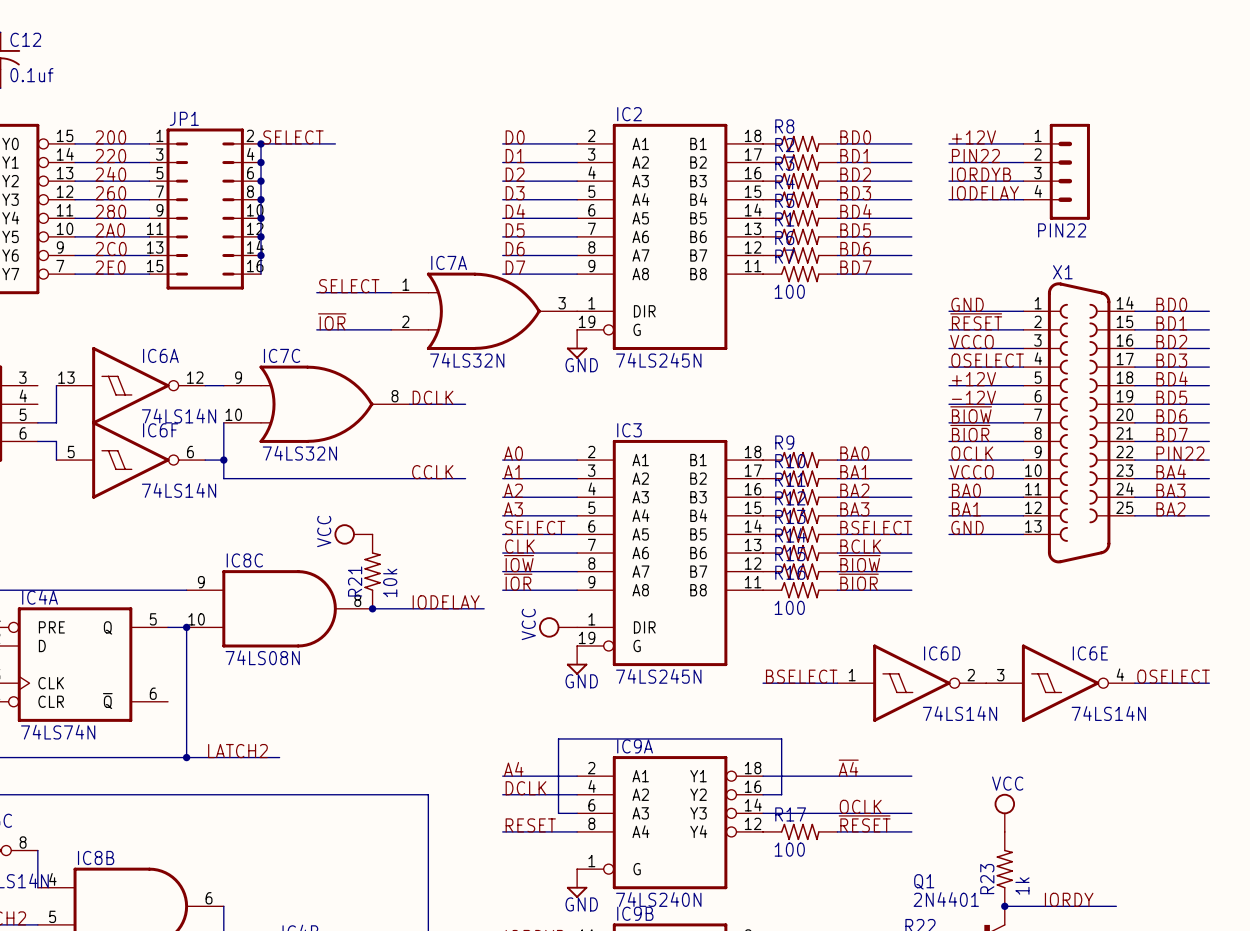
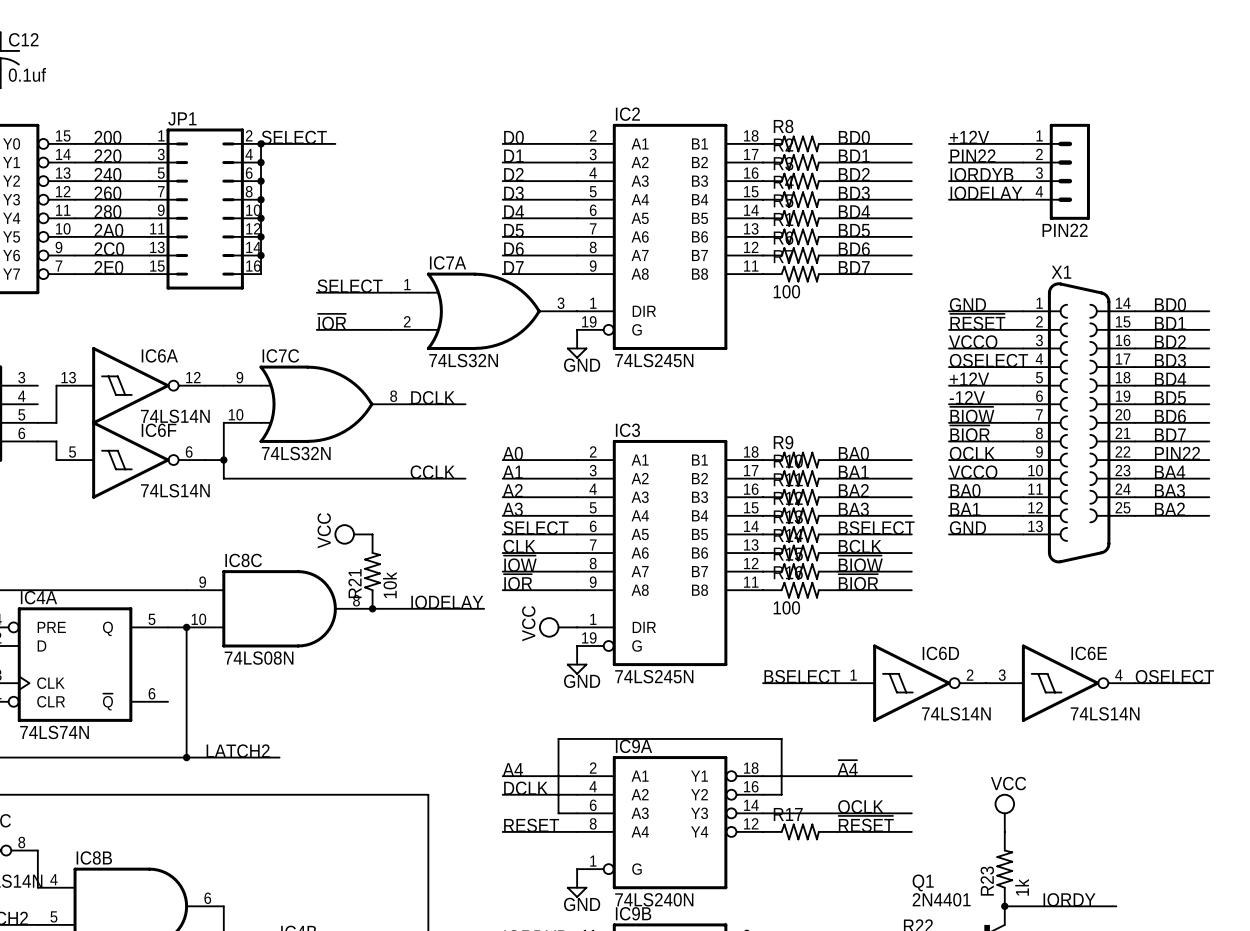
R17 value: 100 (789, 849) -> none

